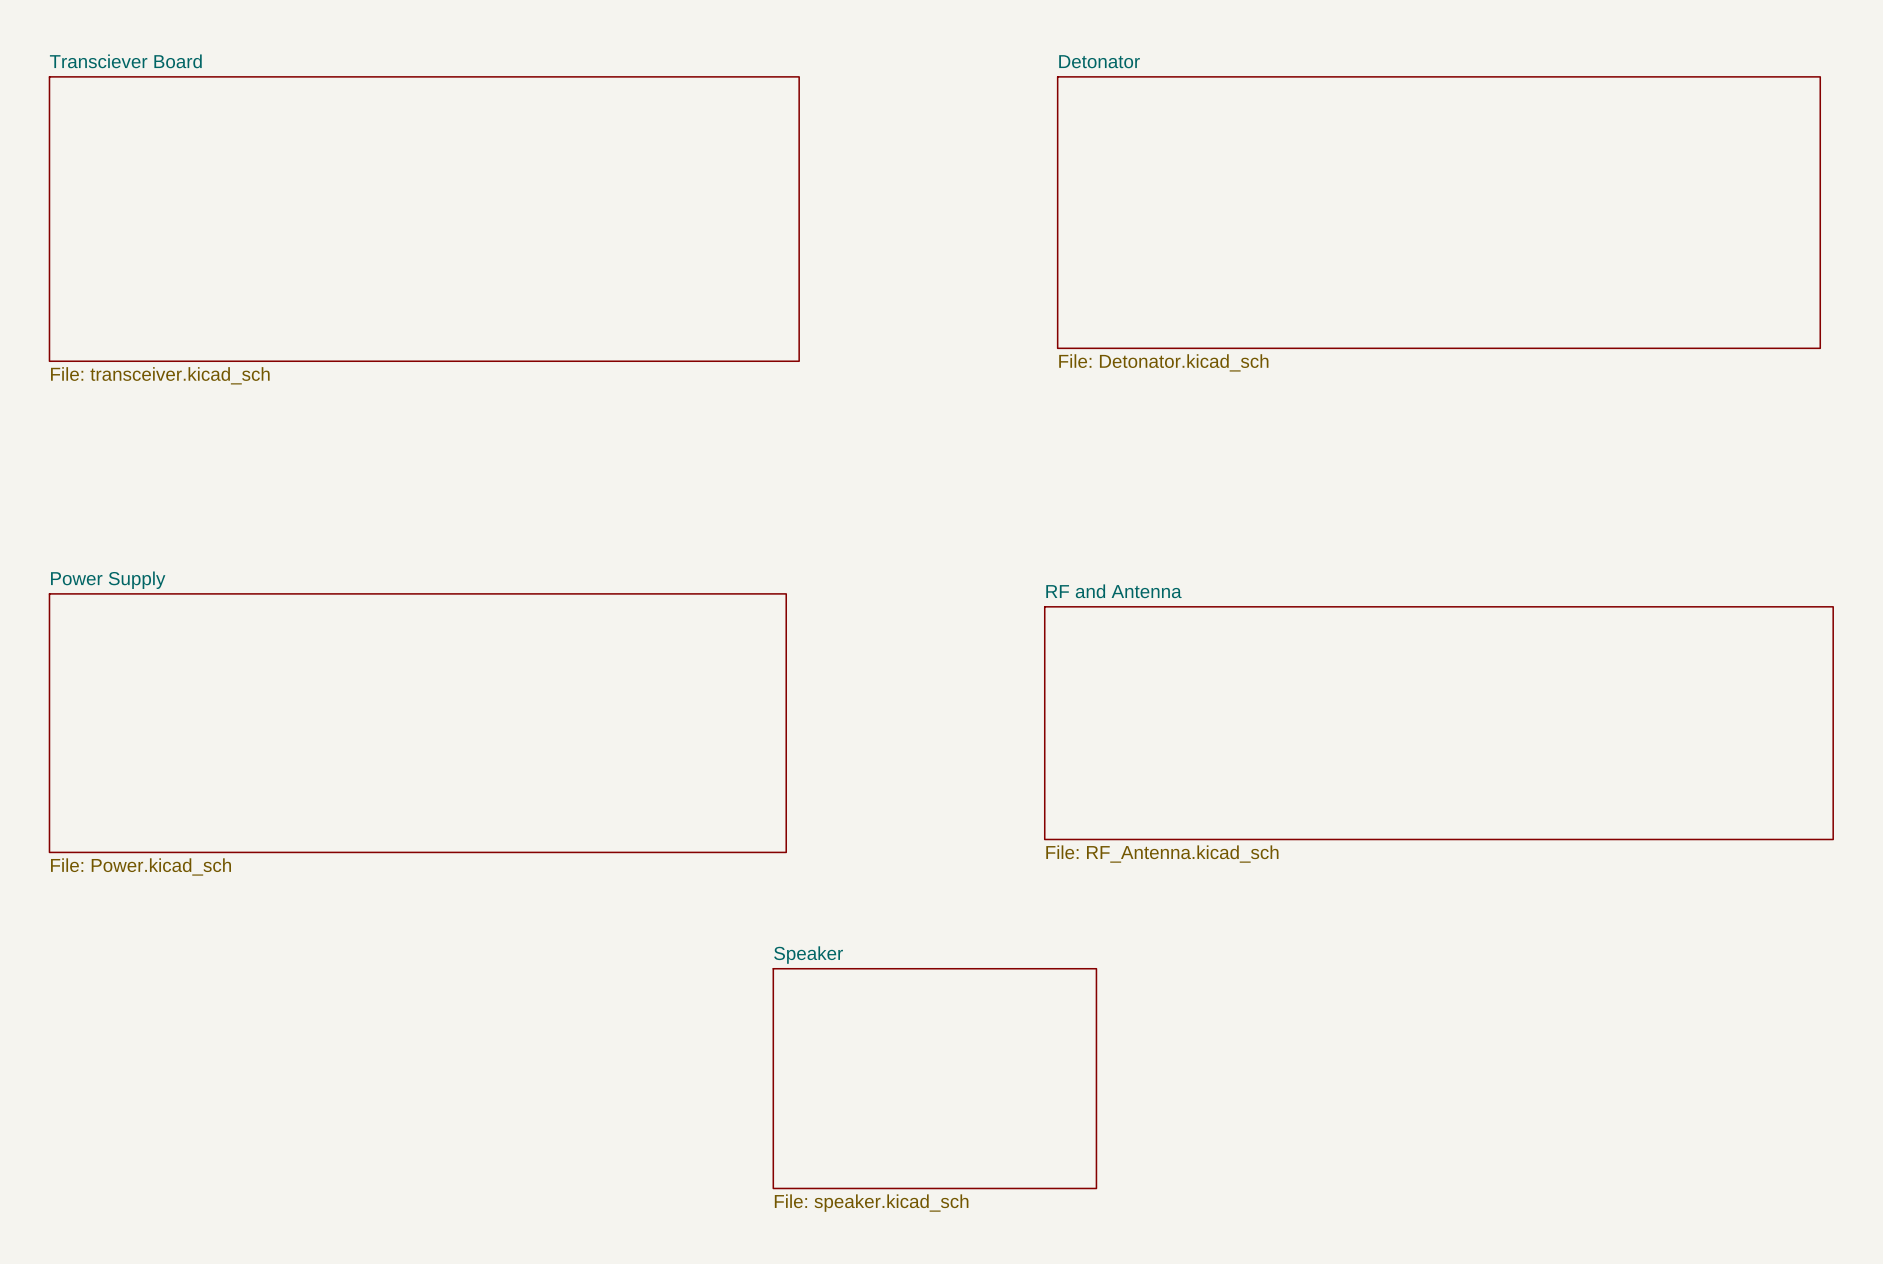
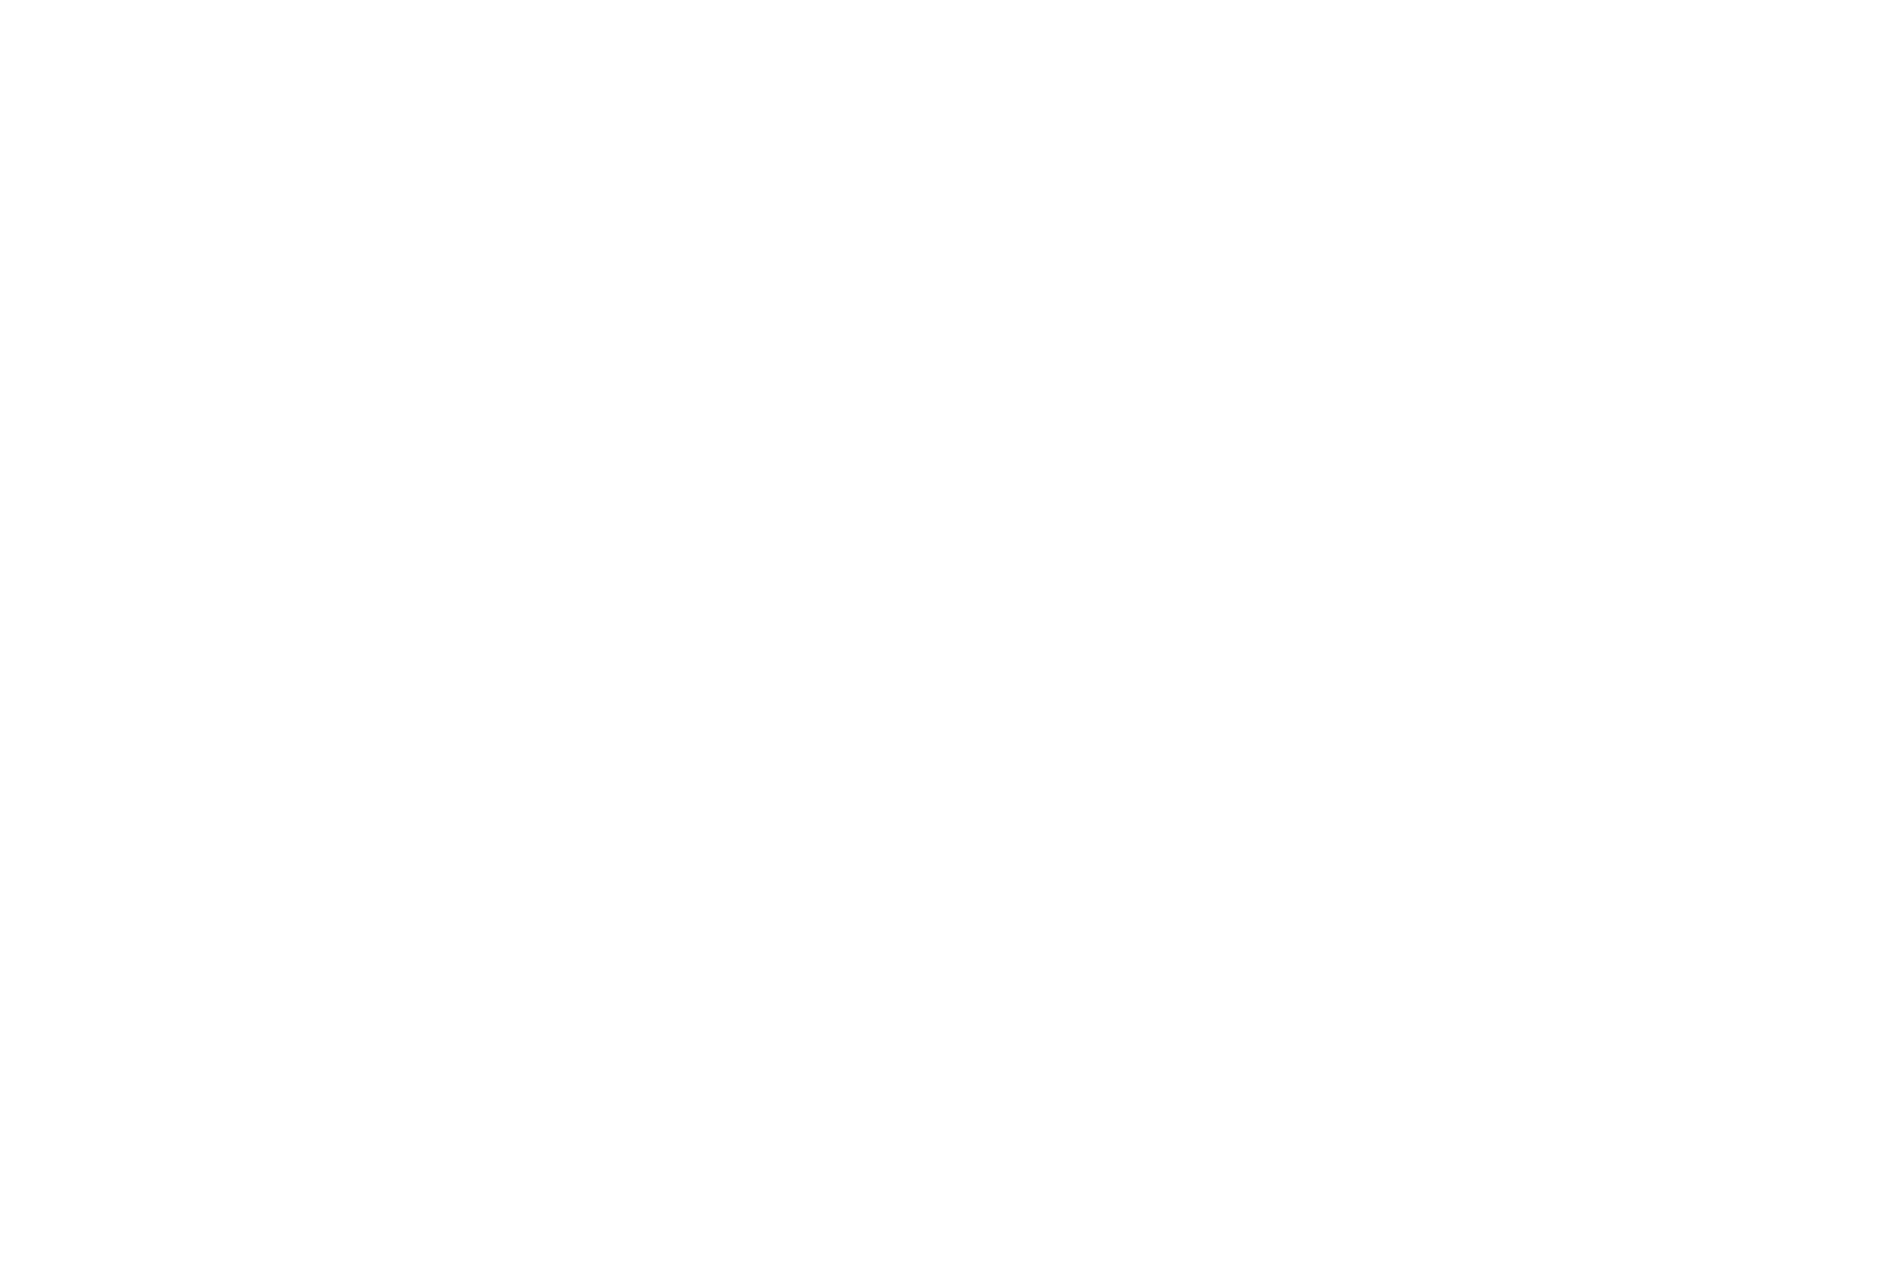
sheet Detonator: File: Detonator.kicad_sch (1438, 212) -> none
sheet Transciever Board: File: transceiver.kicad_sch (424, 219) -> none
sheet Power Supply: File: Power.kicad_sch (417, 723) -> none
sheet RF and Antenna: File: RF_Antenna.kicad_sch (1438, 723) -> none
sheet Speaker: File: speaker.kicad_sch (934, 1078) -> none

